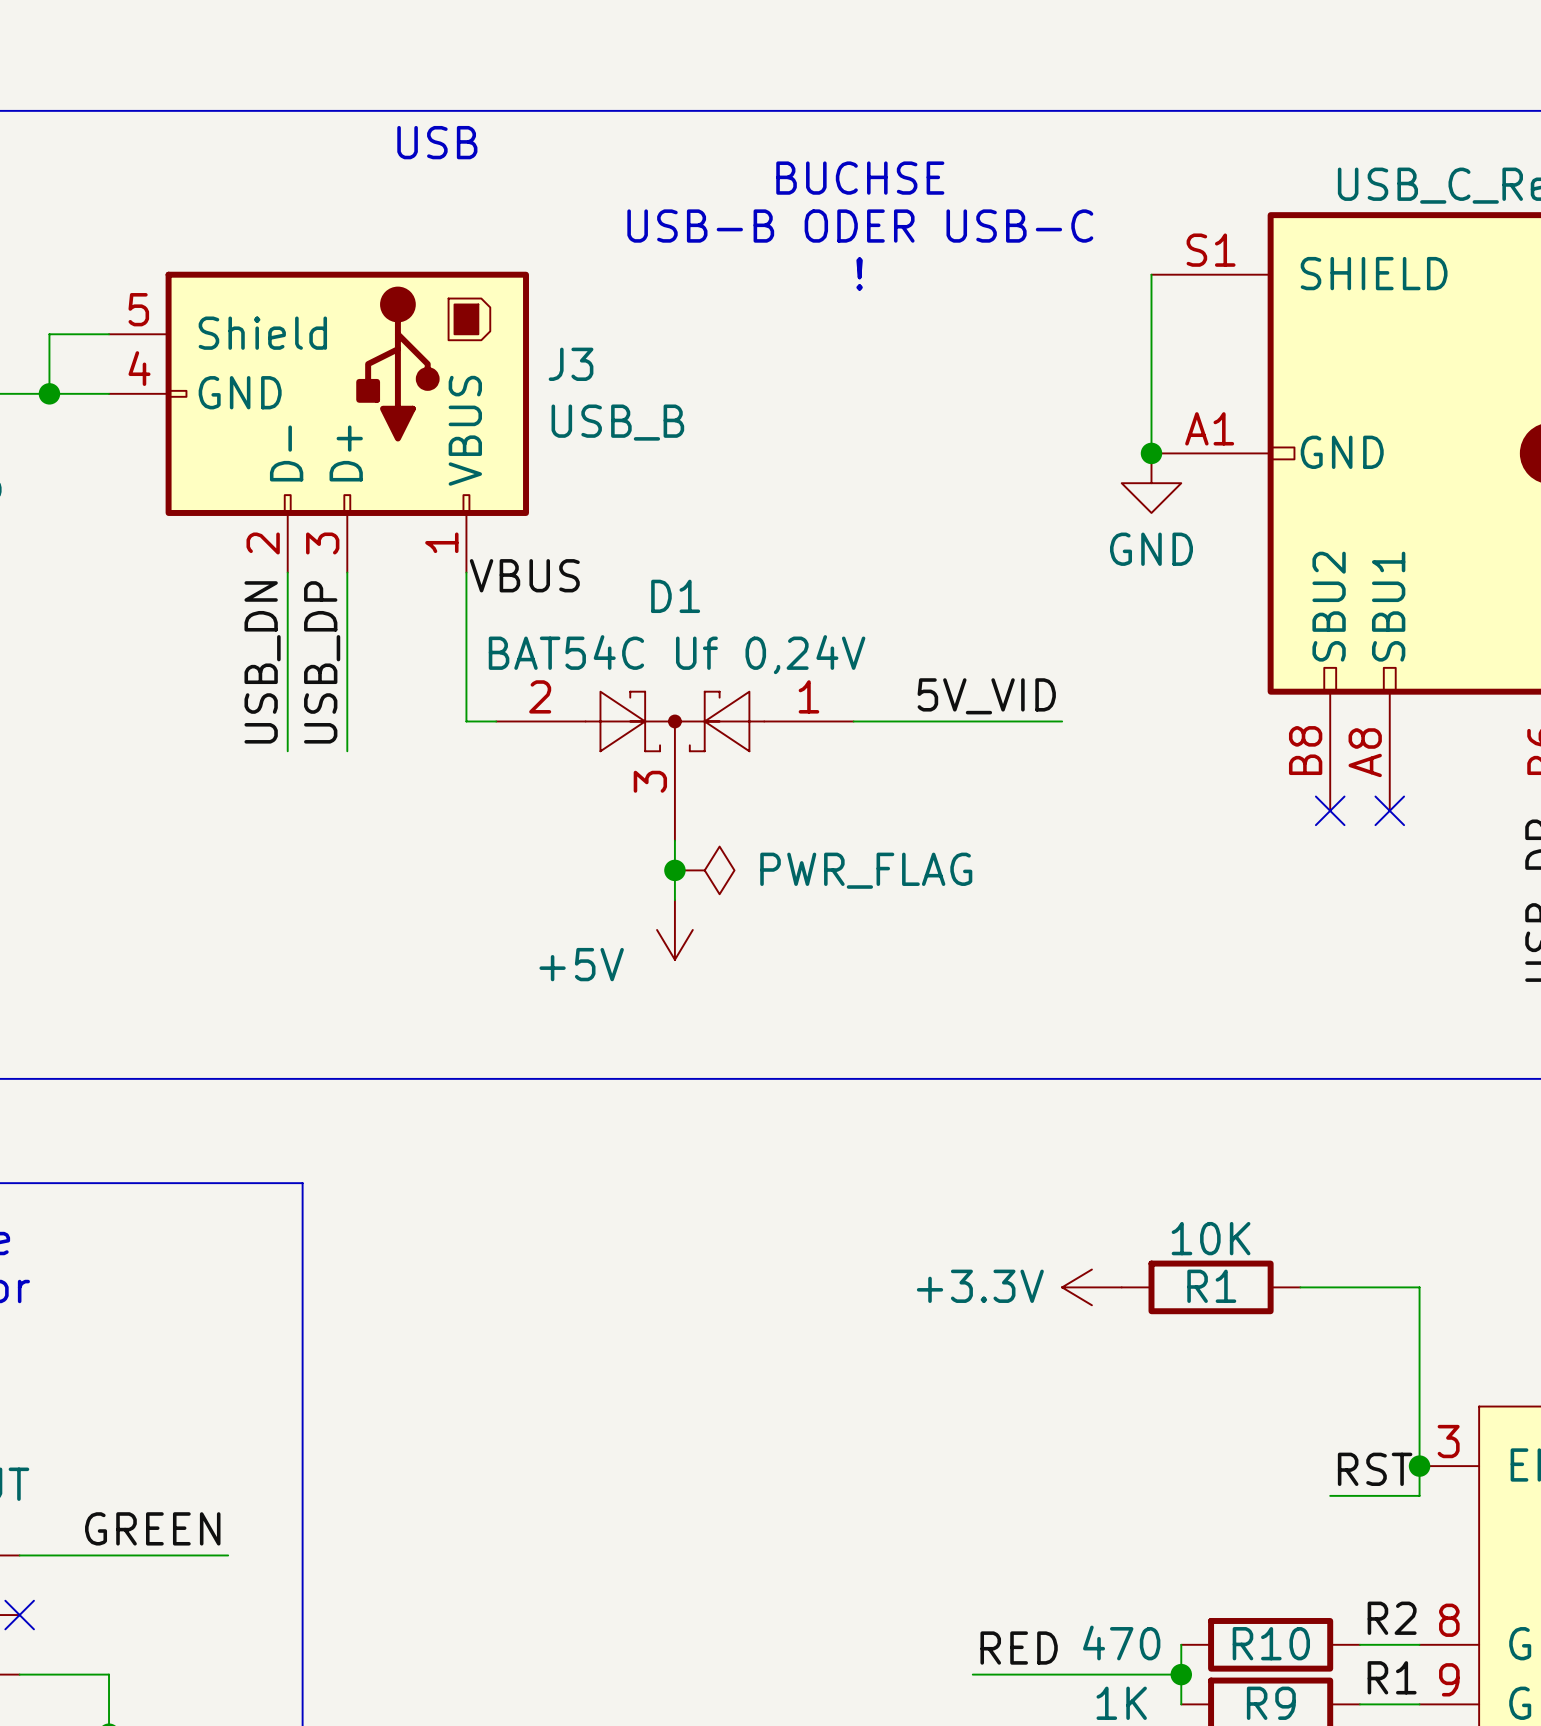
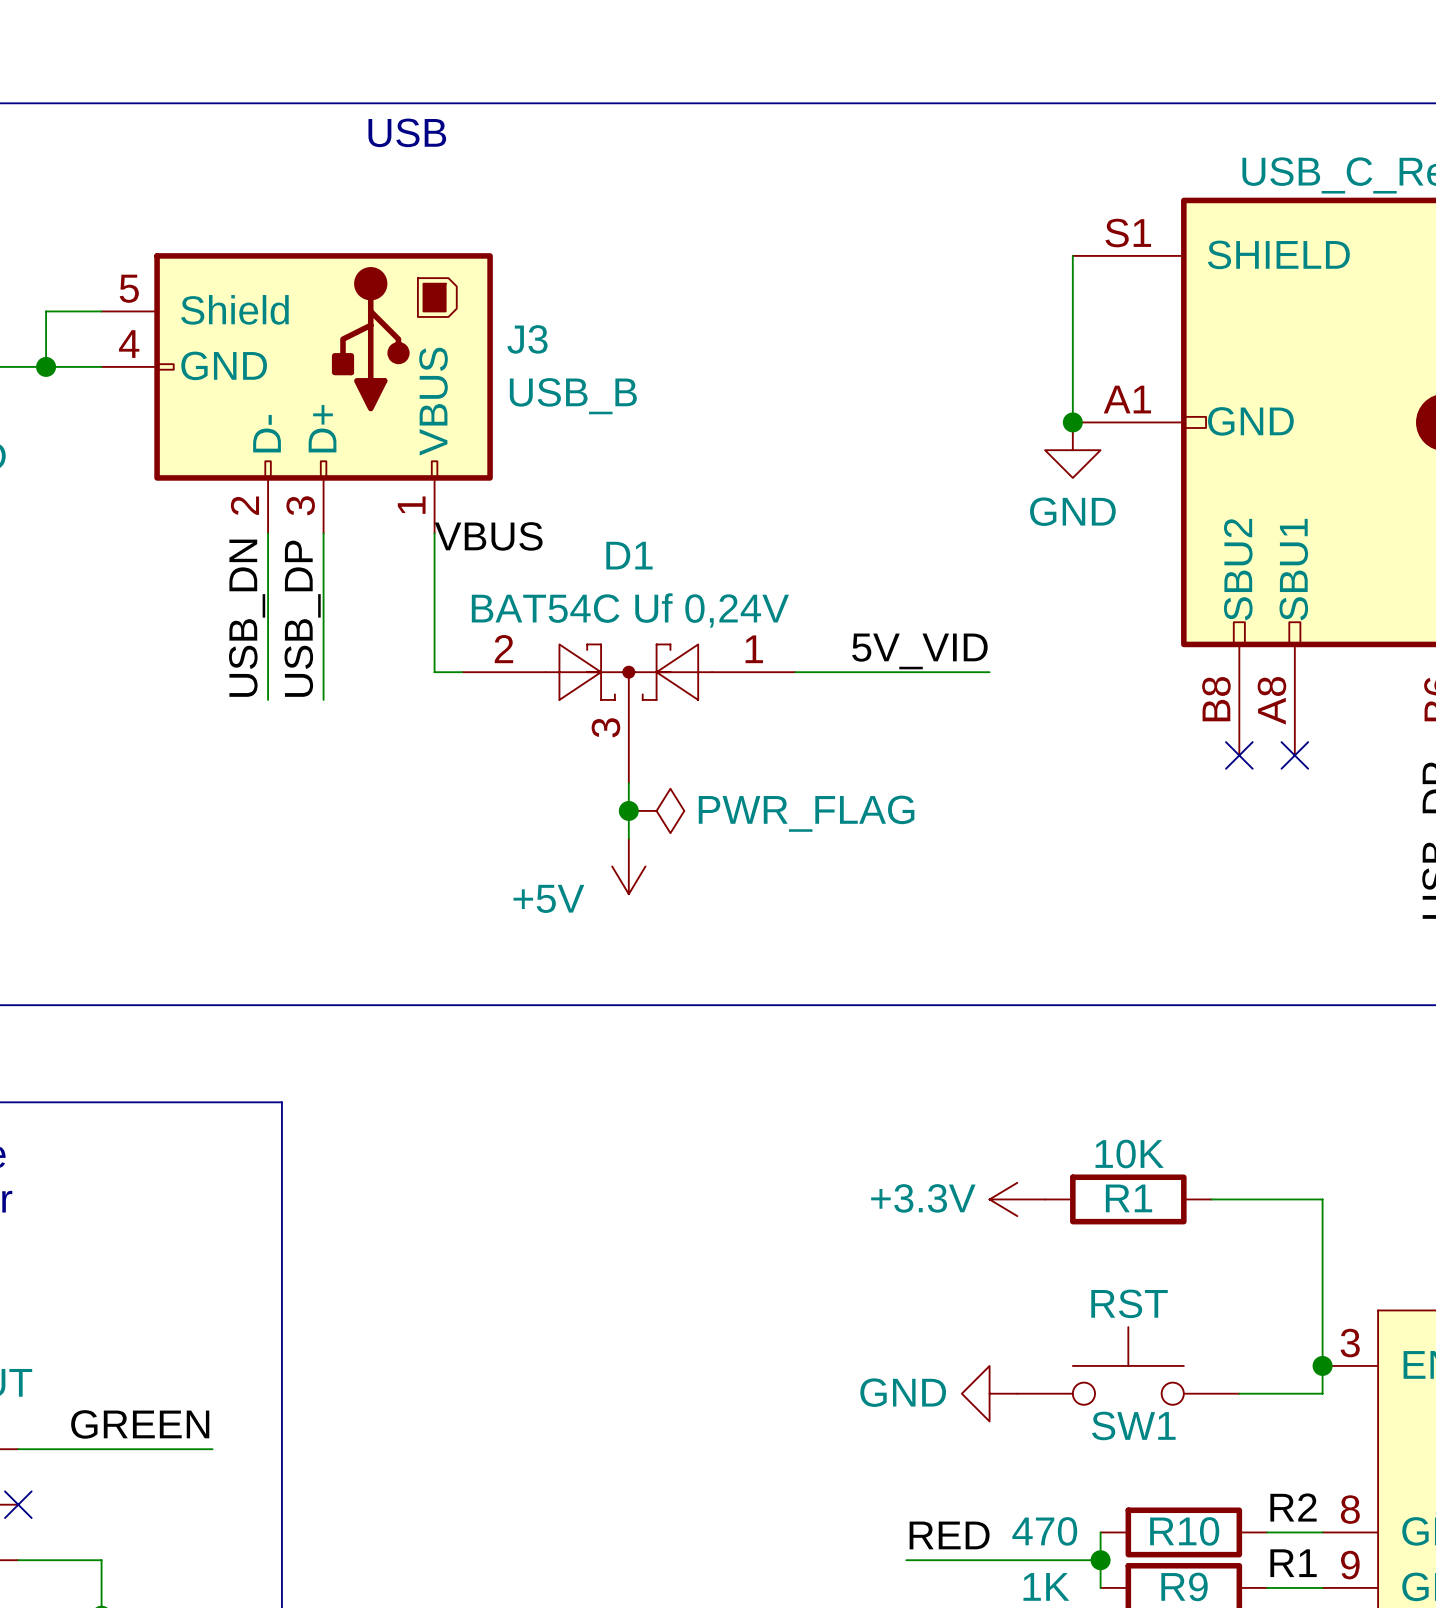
text: BUCHSE (860, 178) -> none
text: USB-B ODER USB-C (860, 226) -> none
text: ! (859, 273) -> none
SW1: none -> RST (1128, 1365)
label: RST (1375, 1469) -> none
power symbol: none -> GND (989, 1393)

